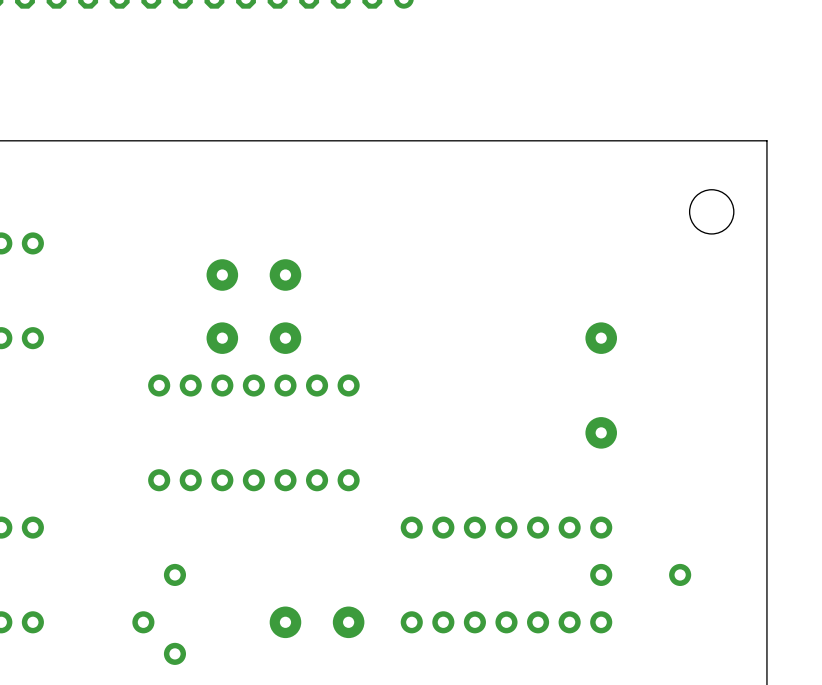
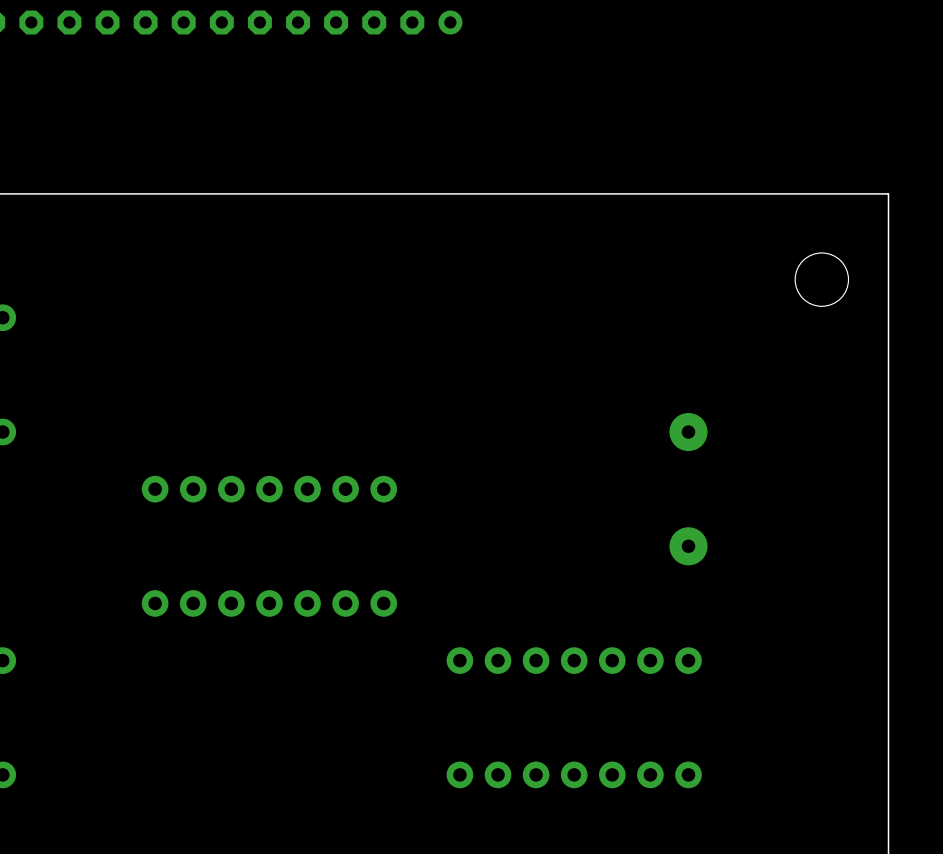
part: (222, 275) -> none
part: (285, 275) -> none
part: (222, 338) -> none
part: (285, 338) -> none
part: (174, 574) -> none
part: (601, 574) -> none
part: (680, 574) -> none
part: (143, 622) -> none
part: (285, 622) -> none
part: (348, 622) -> none
part: (174, 653) -> none

